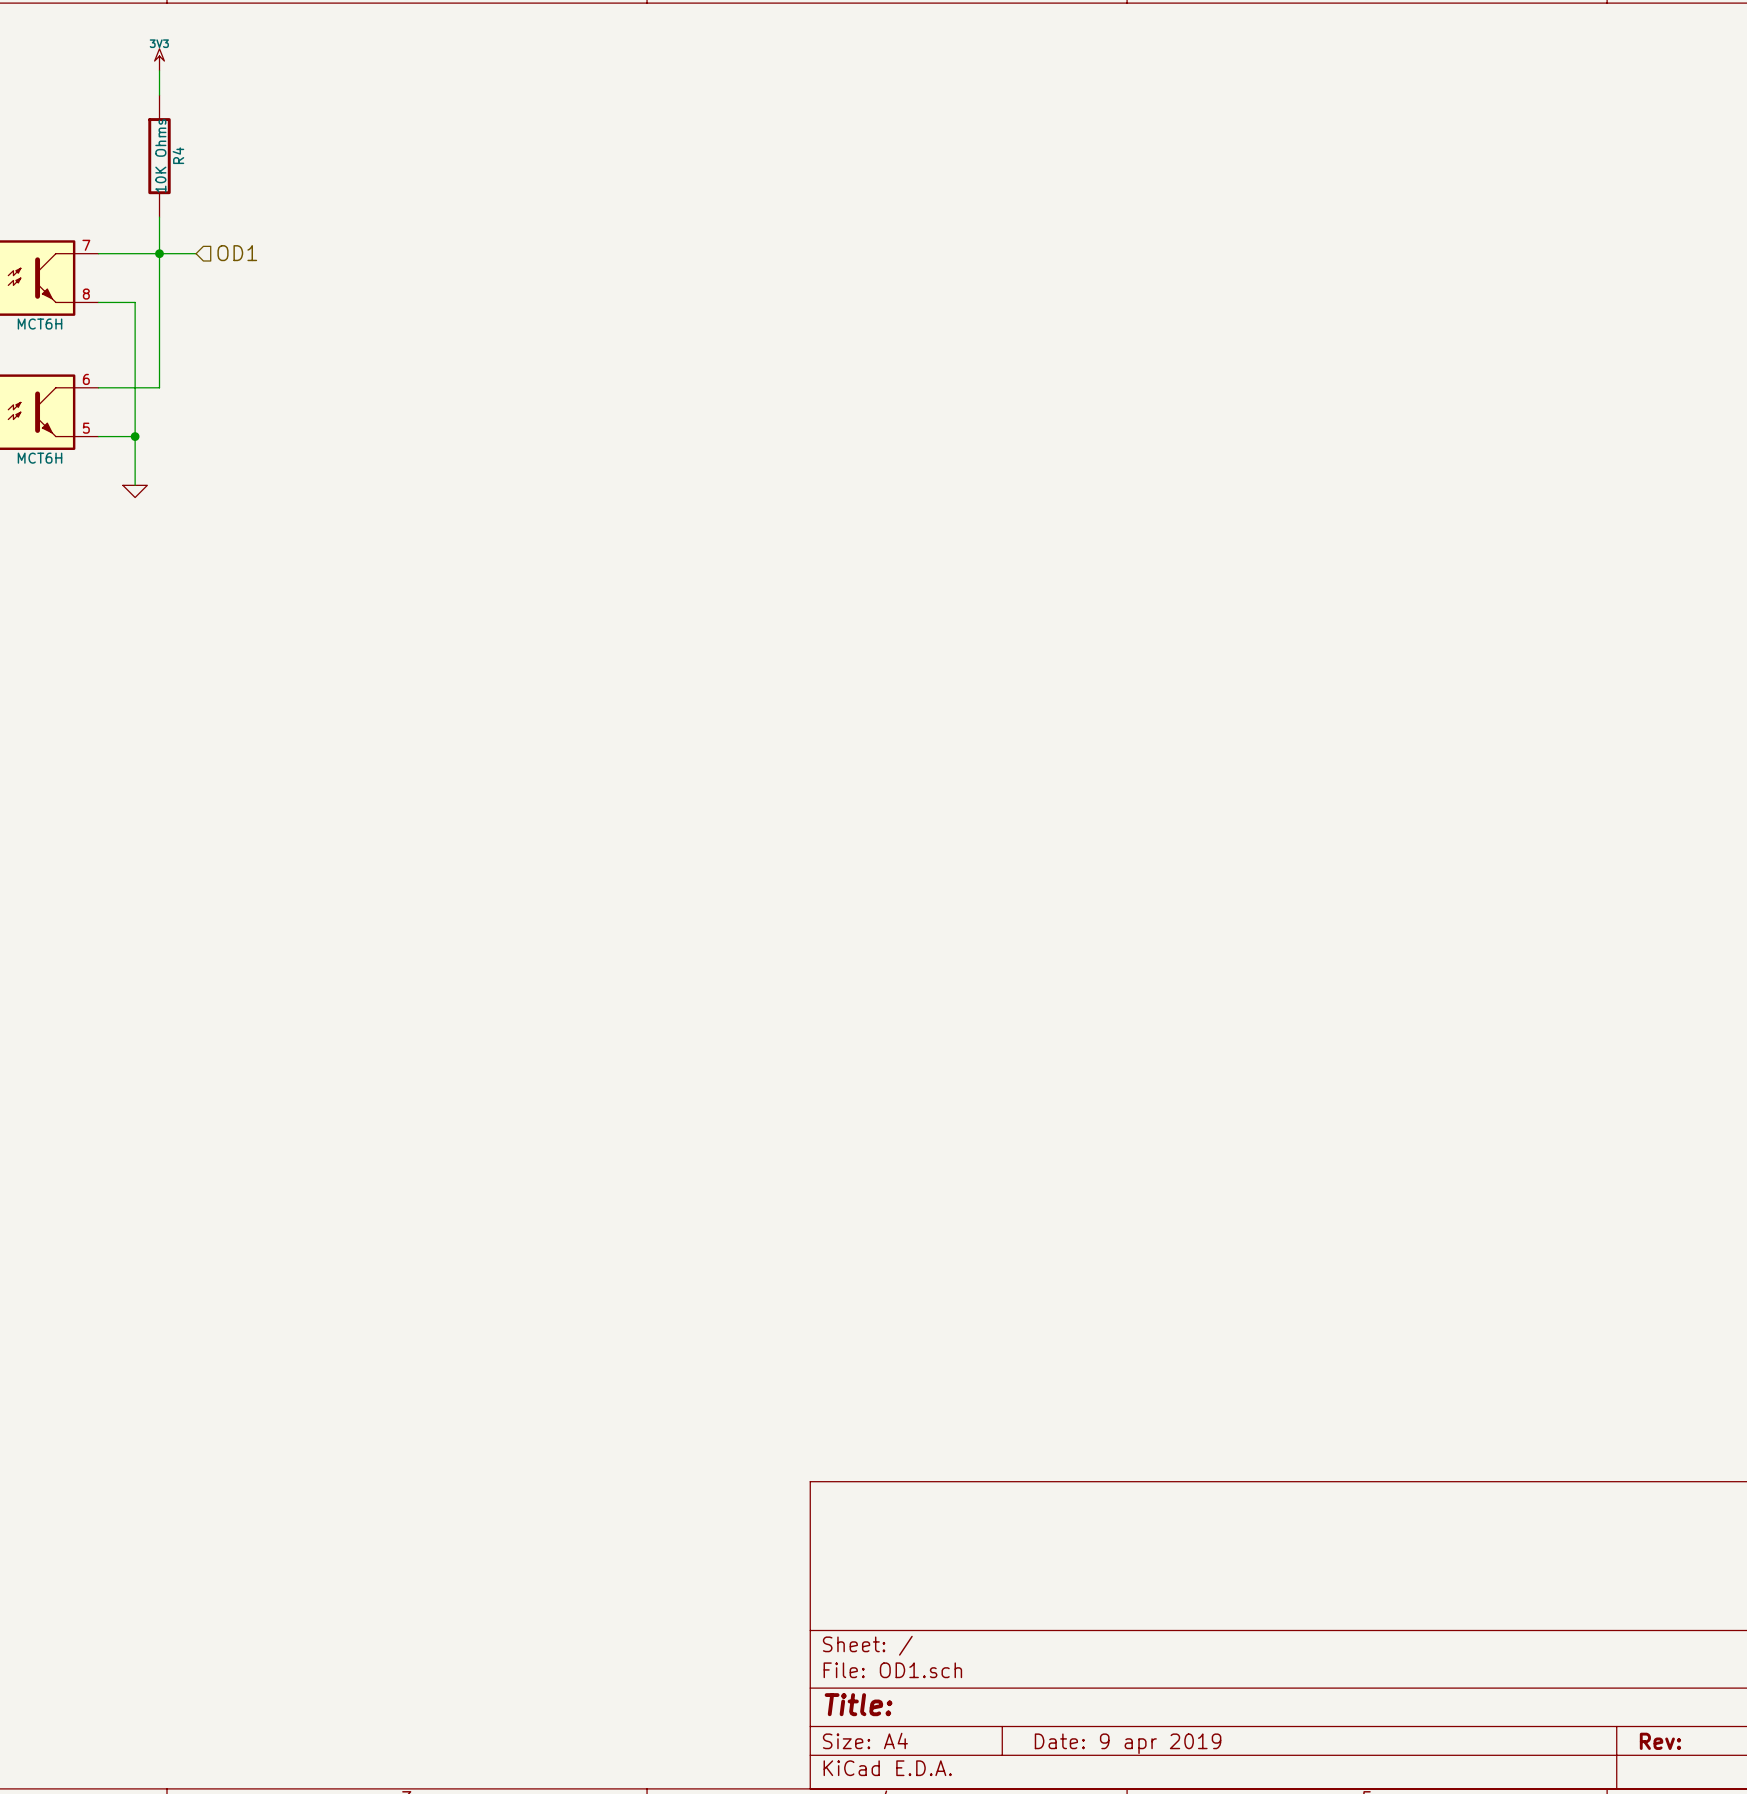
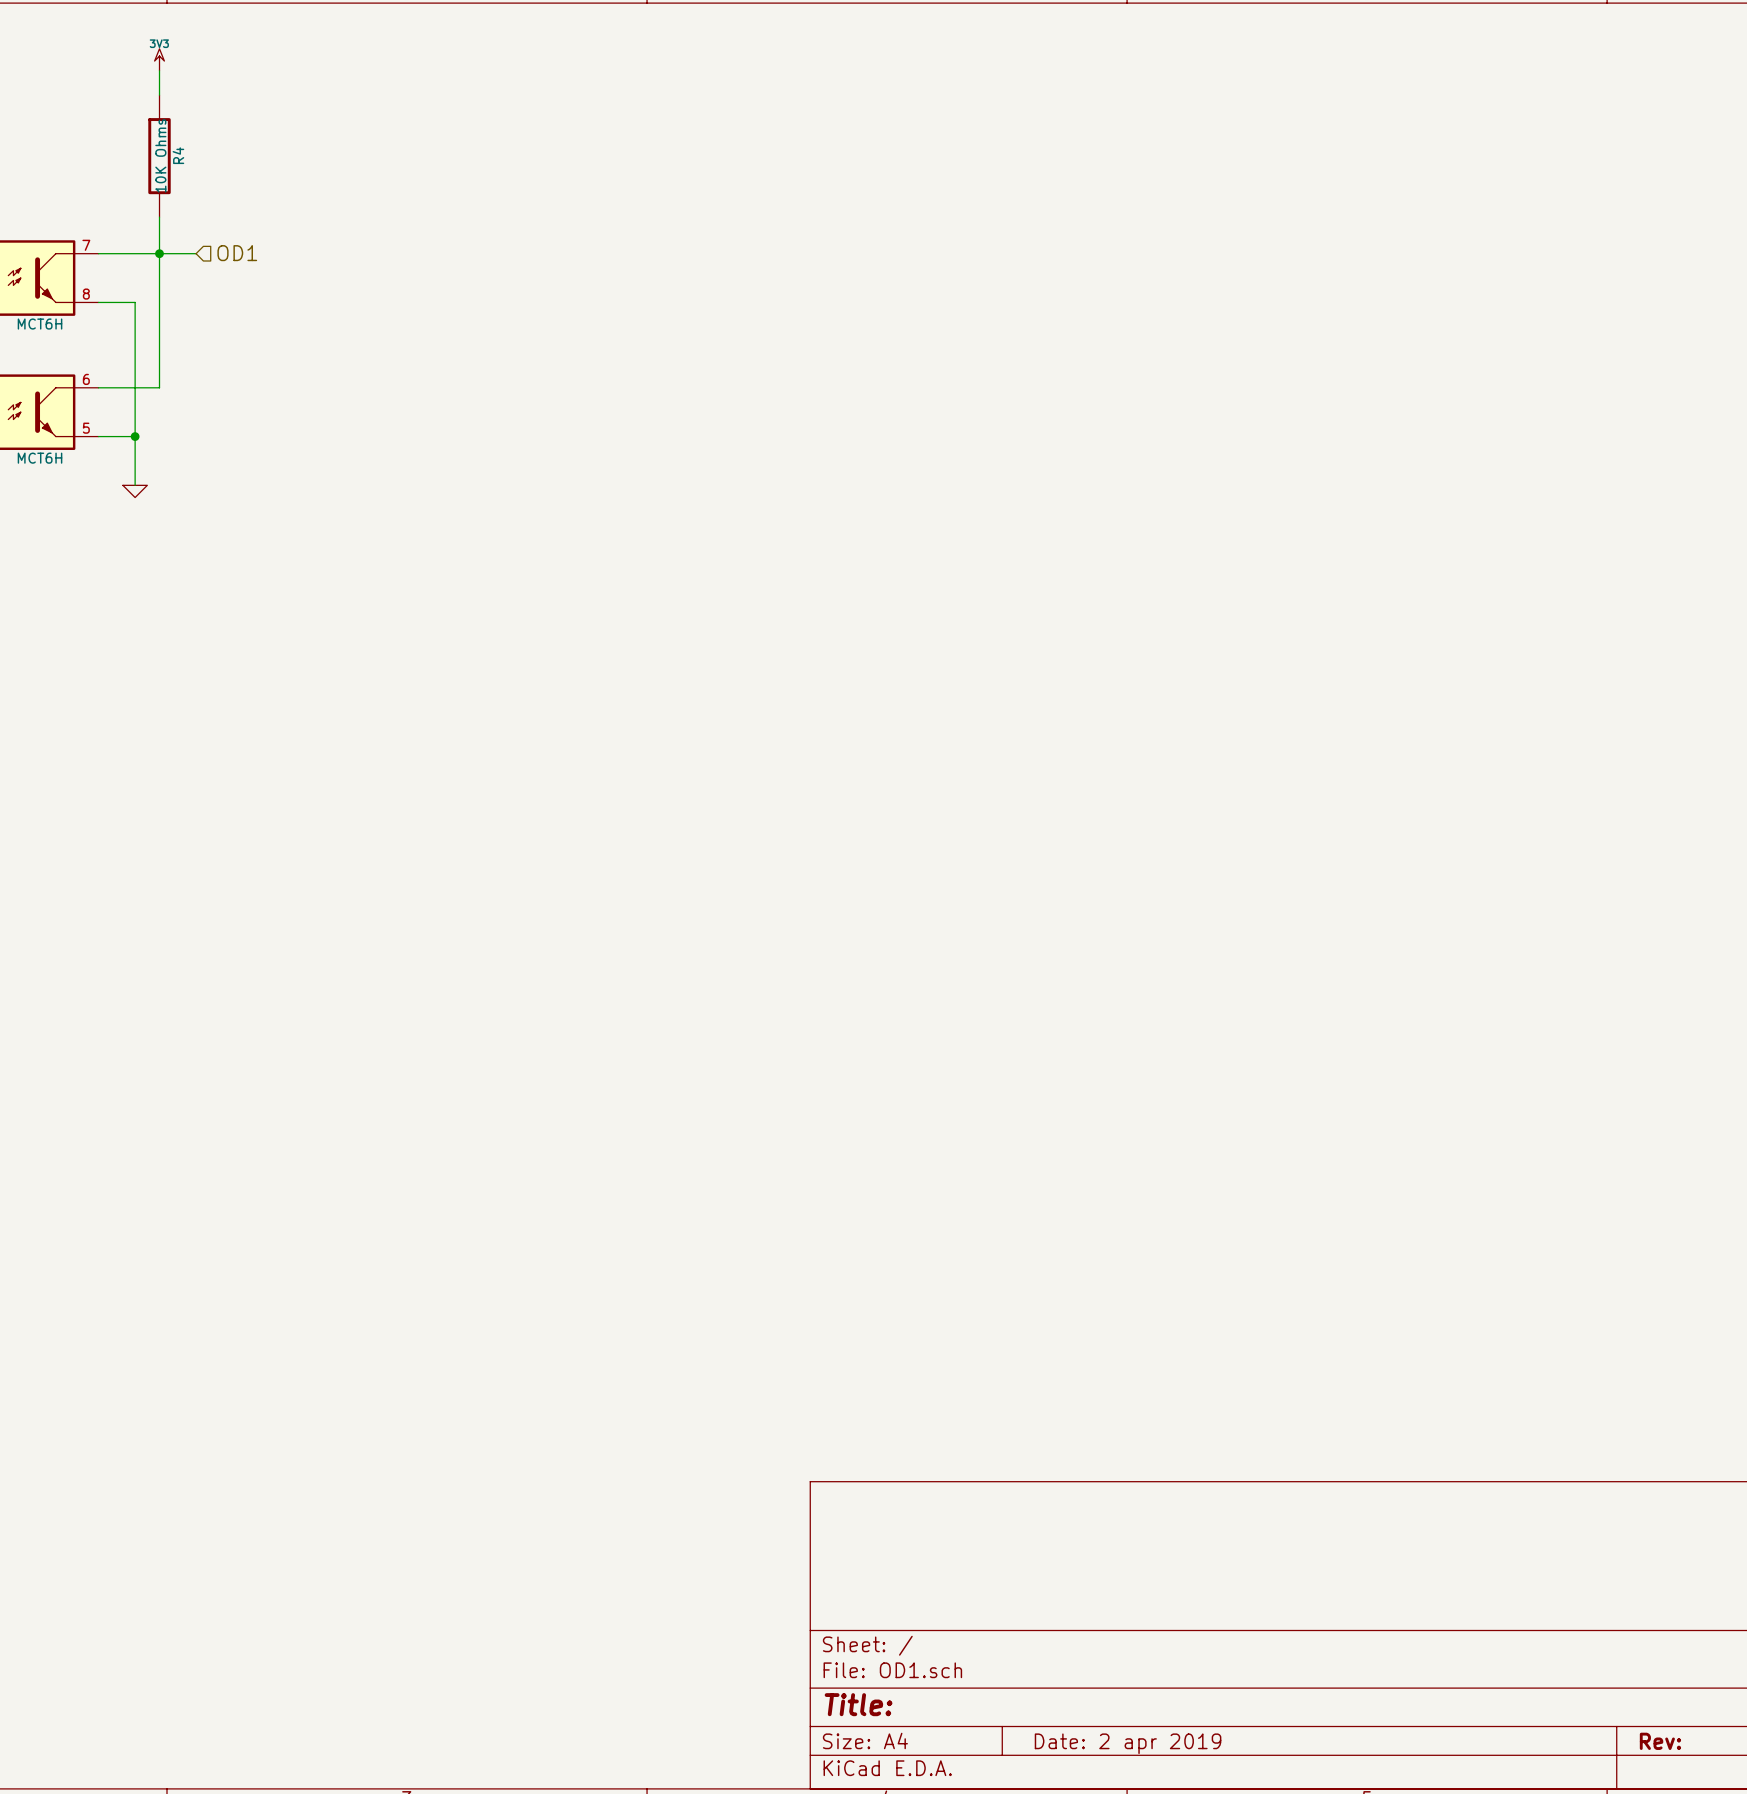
title block: Date: 9 apr 2019 (1128, 1743) -> Date: 2 apr 2019 (1128, 1743)

